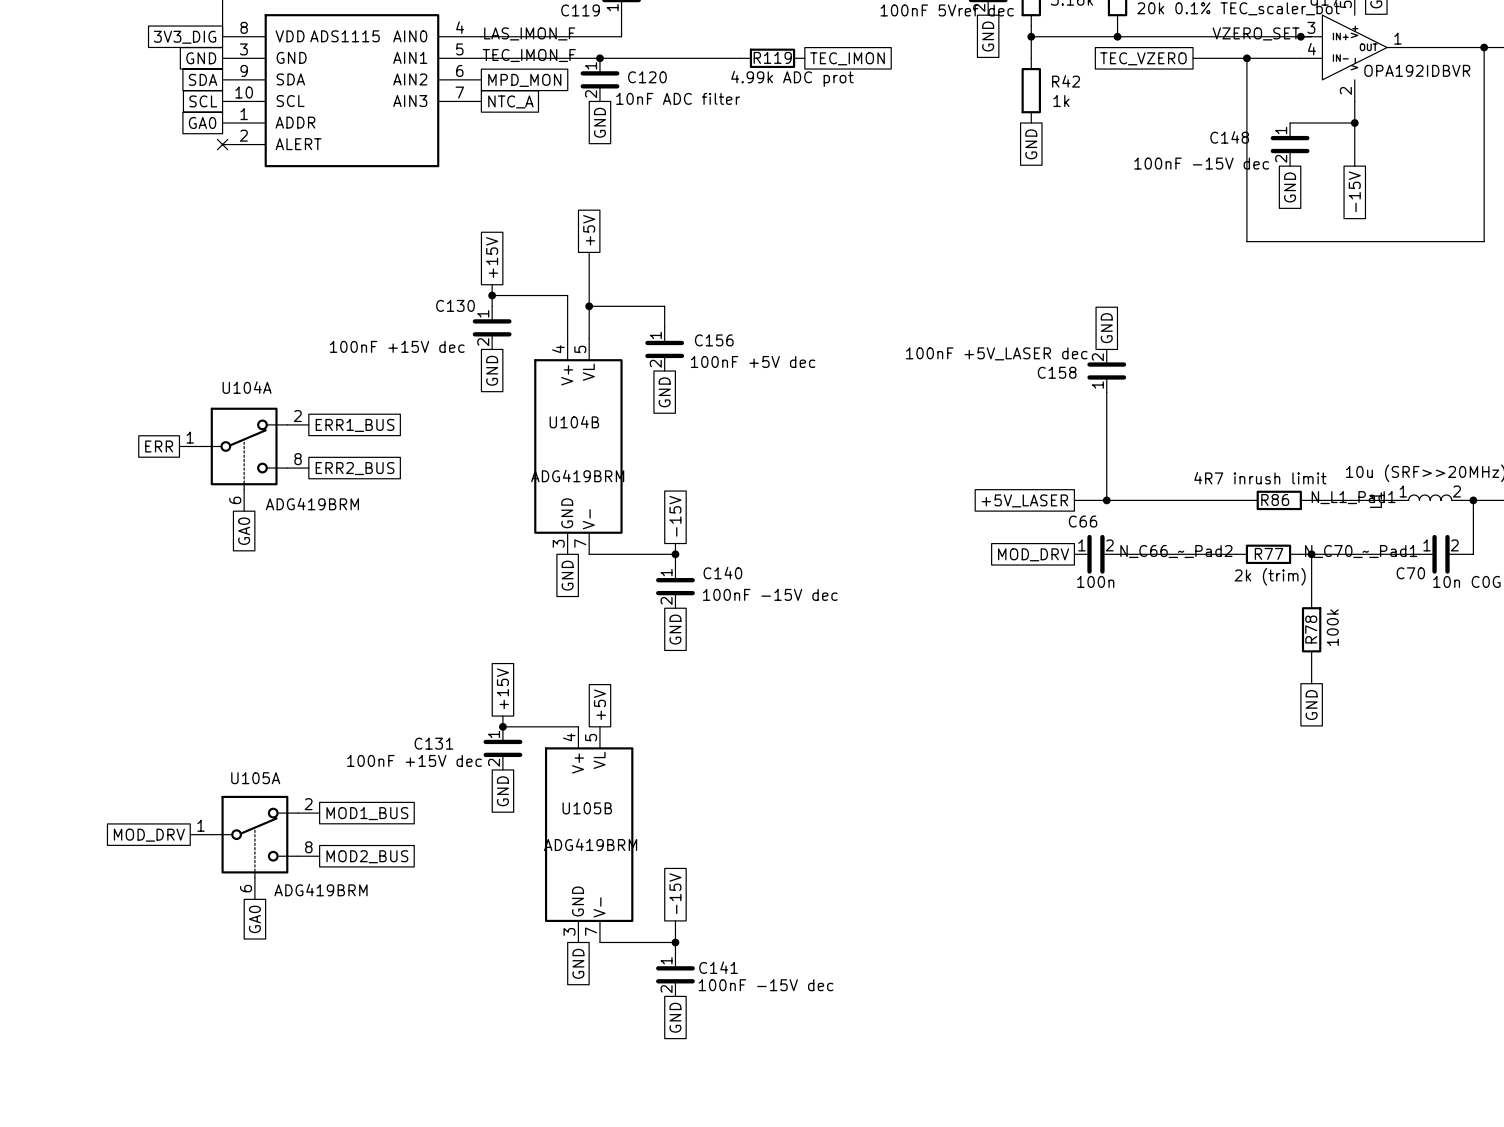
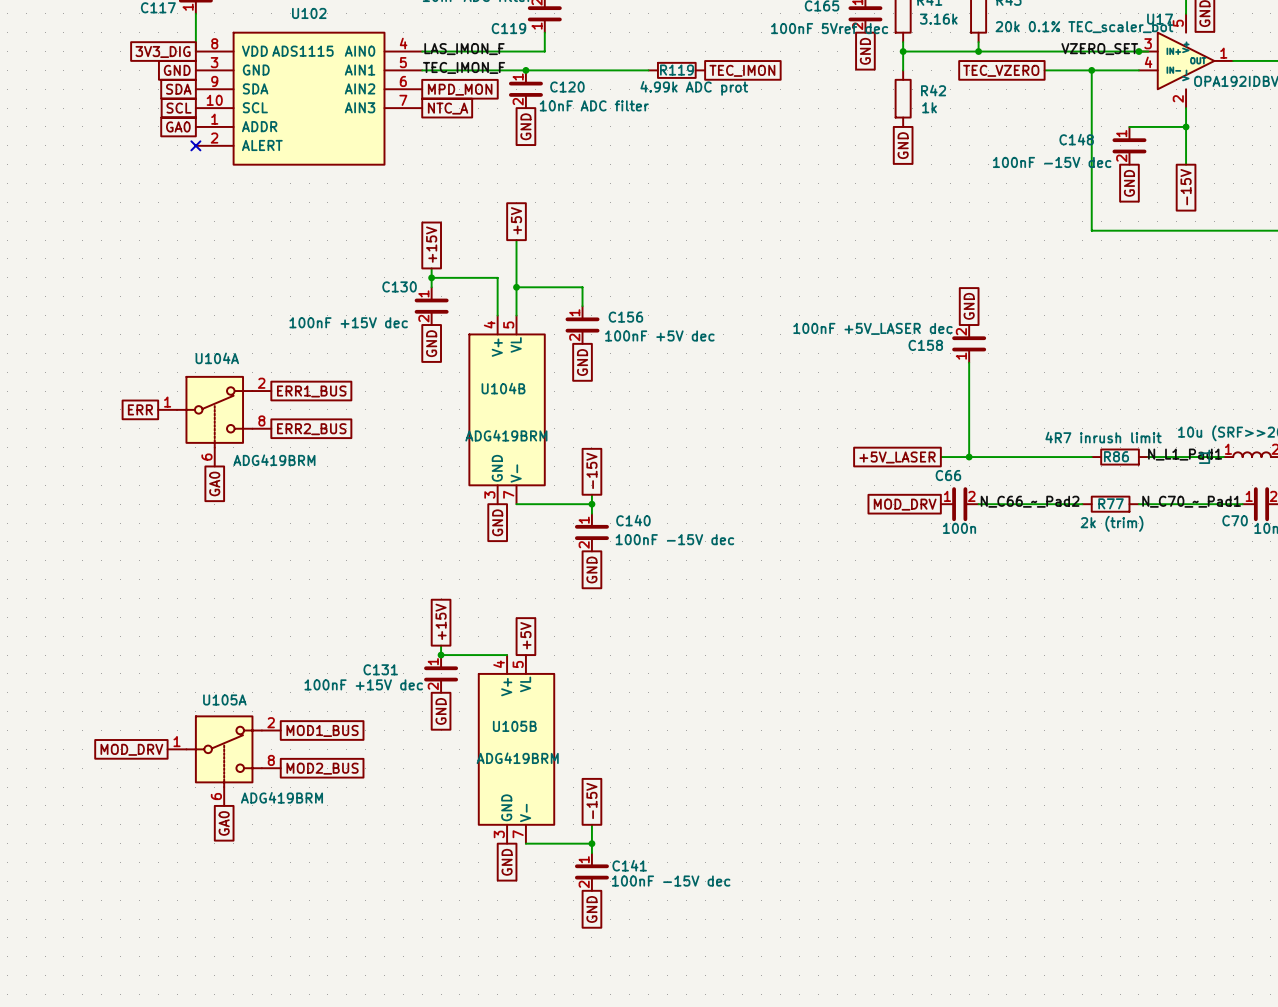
wire: (1311, 554) (1311, 597) -> none
junction: (1311, 554) -> none
R78: 100k (1311, 629) -> none
wire: (1311, 662) (1311, 683) -> none
global label: GND (1311, 705) -> none

